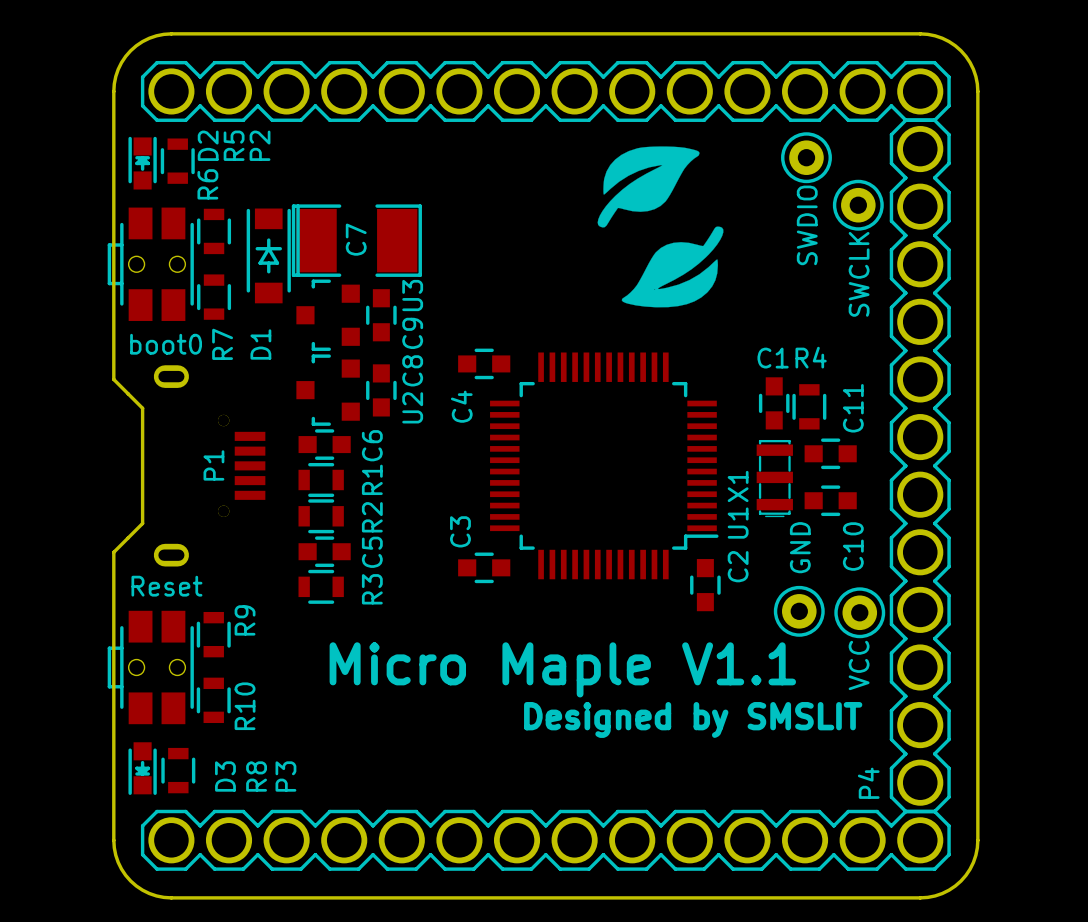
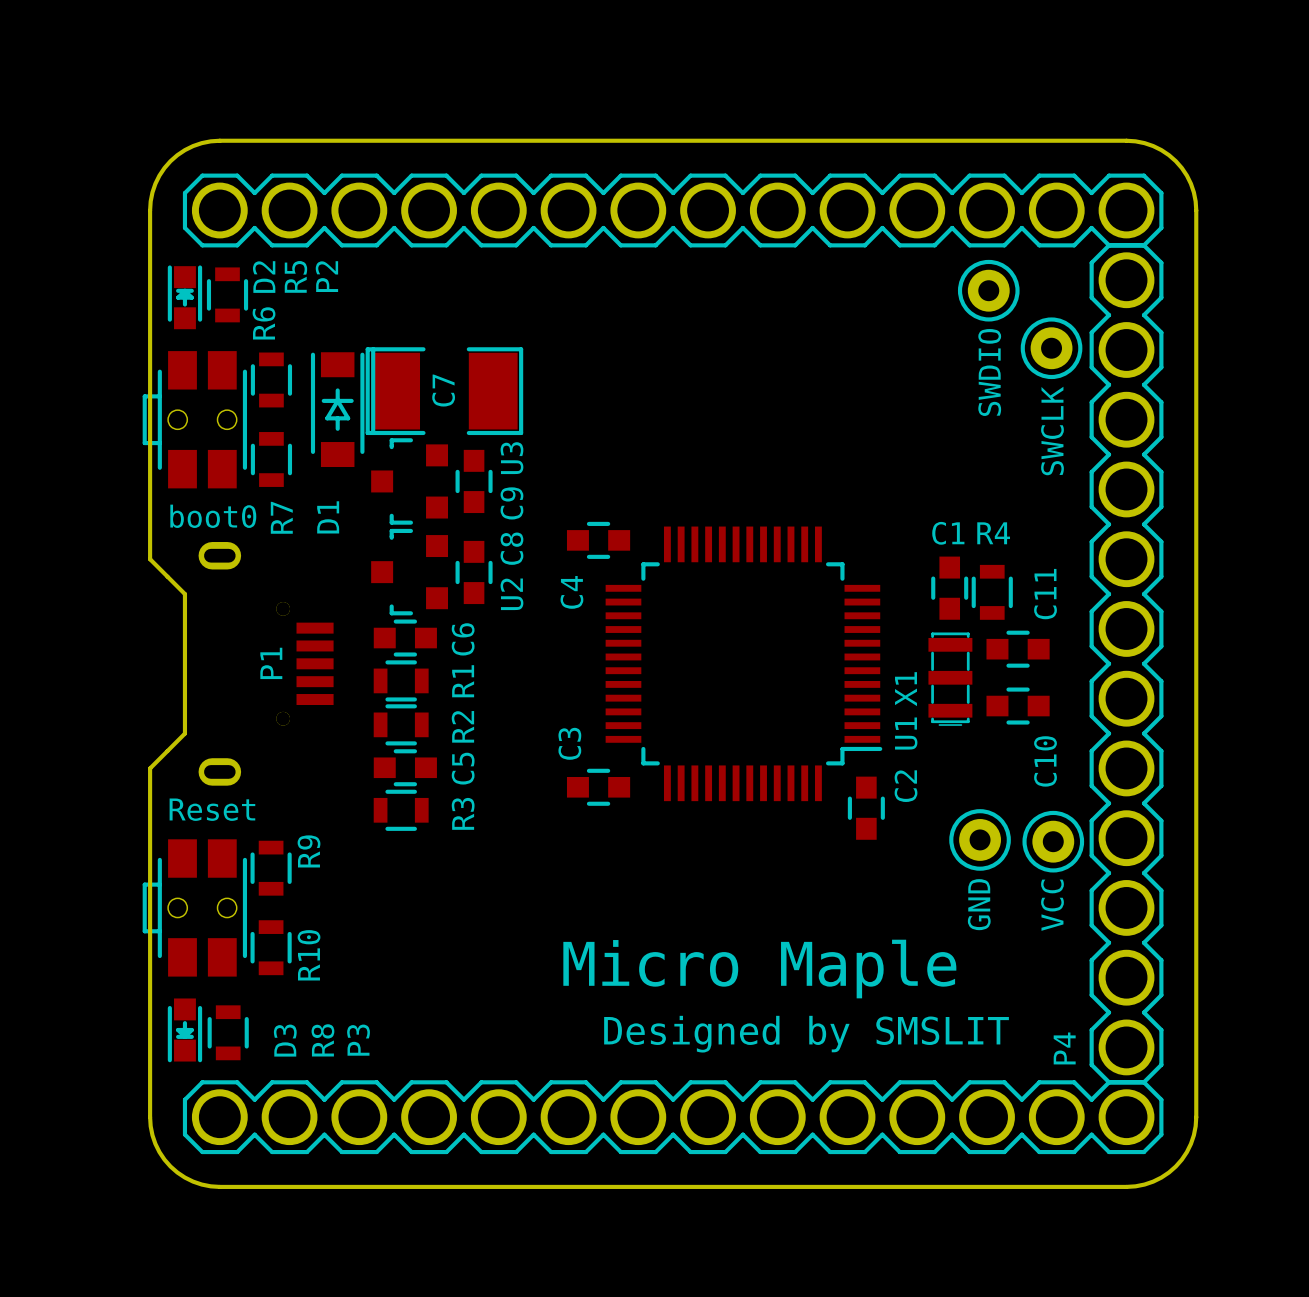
drawing: [597, 146, 724, 308] -> none
text position: GND (800, 547) -> GND (979, 904)
text: Micro Maple V1.1 (562, 669) -> Micro Maple (759, 969)
text position: Designed by SMSLIT (693, 719) -> Designed by SMSLIT (806, 1034)

